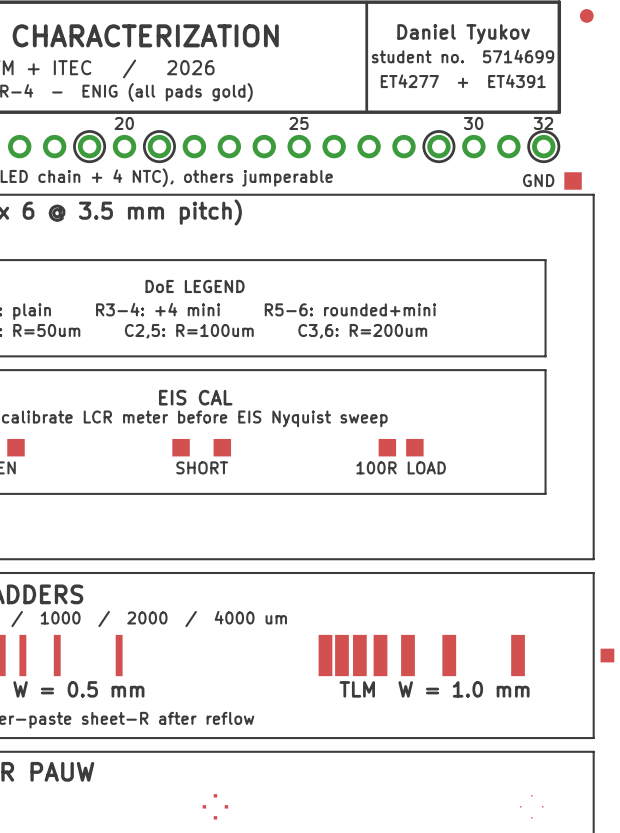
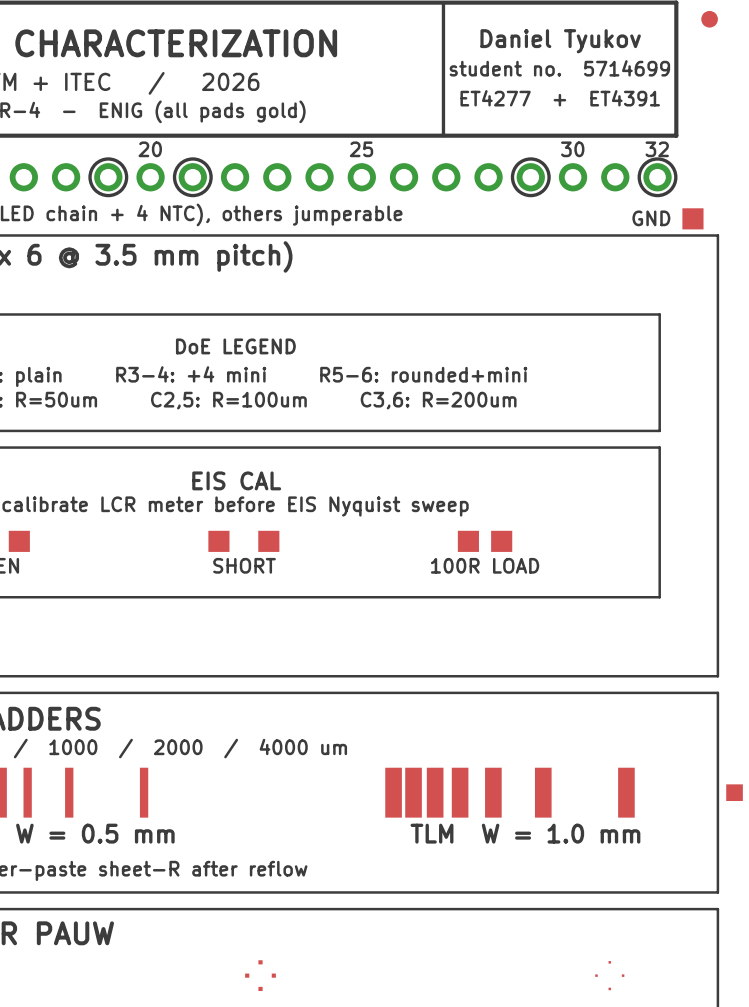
part: none -> (609, 975)
part: (531, 806) -> none

